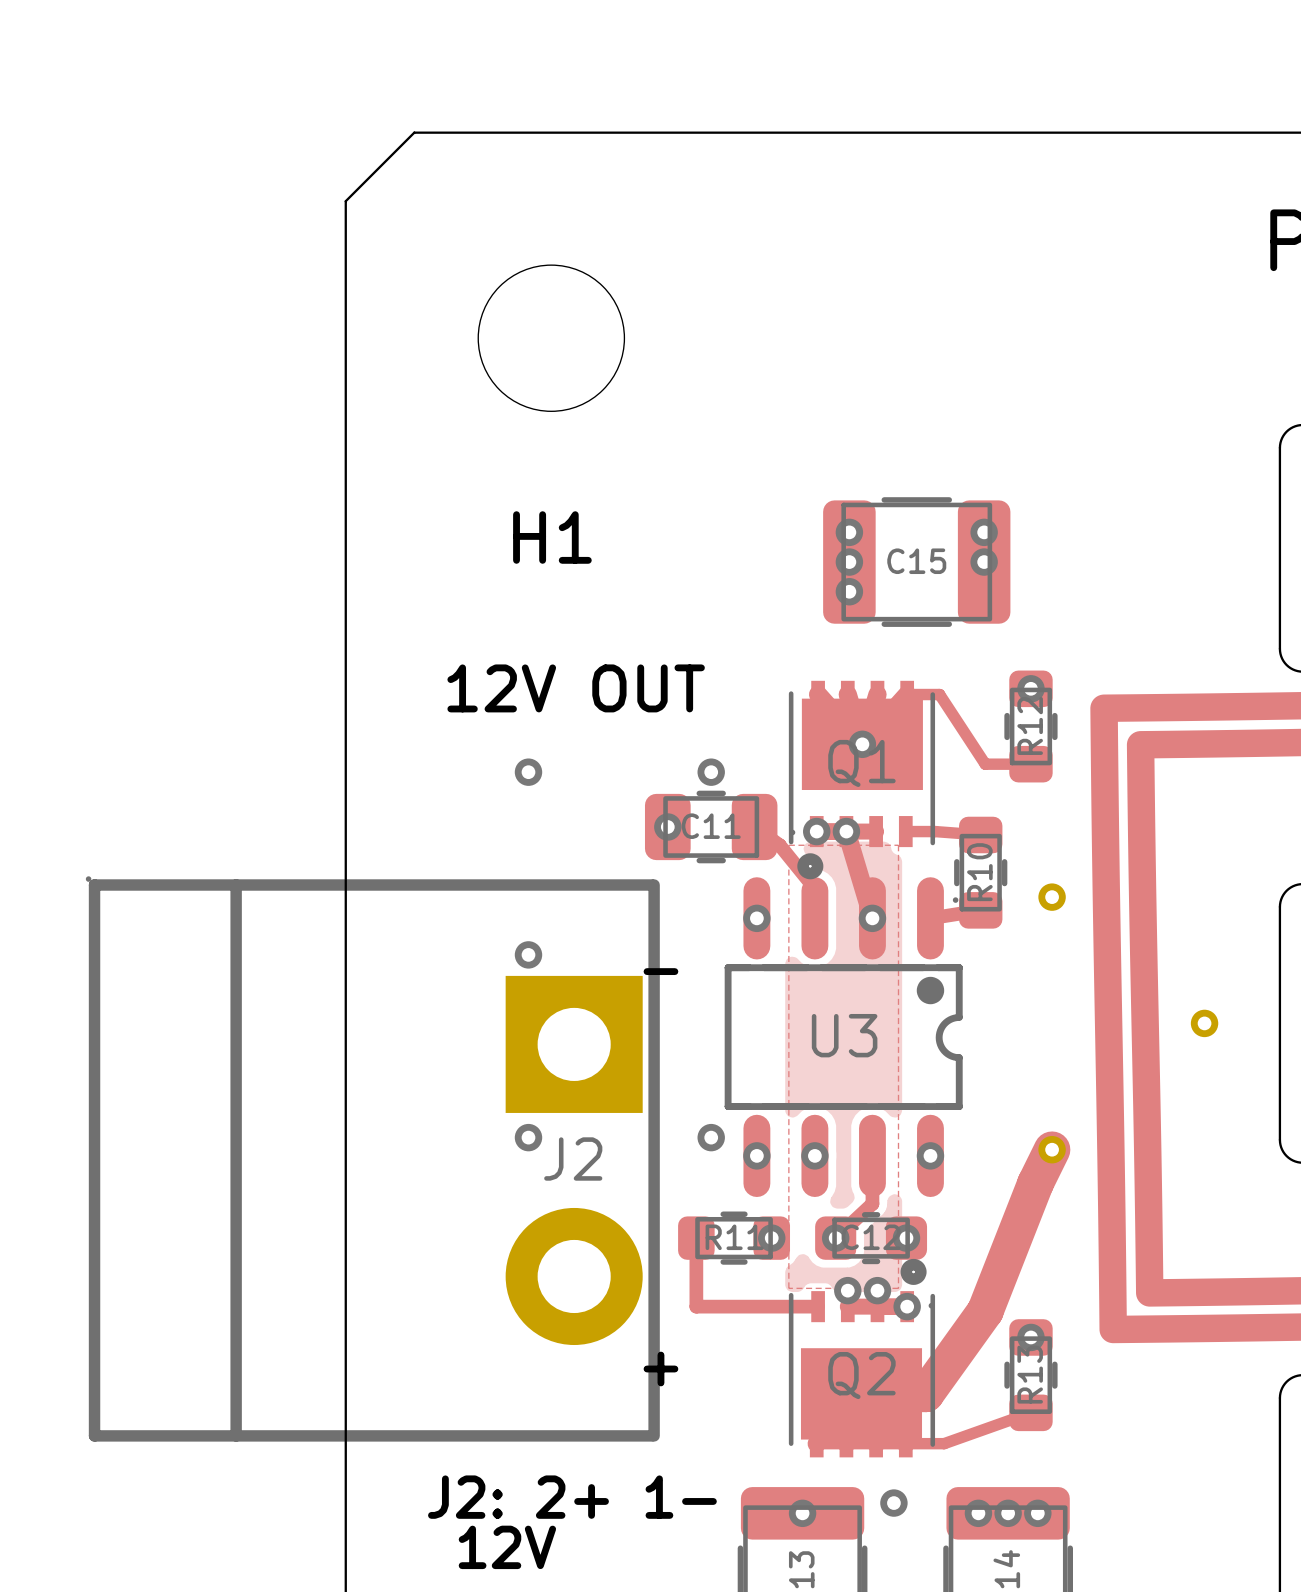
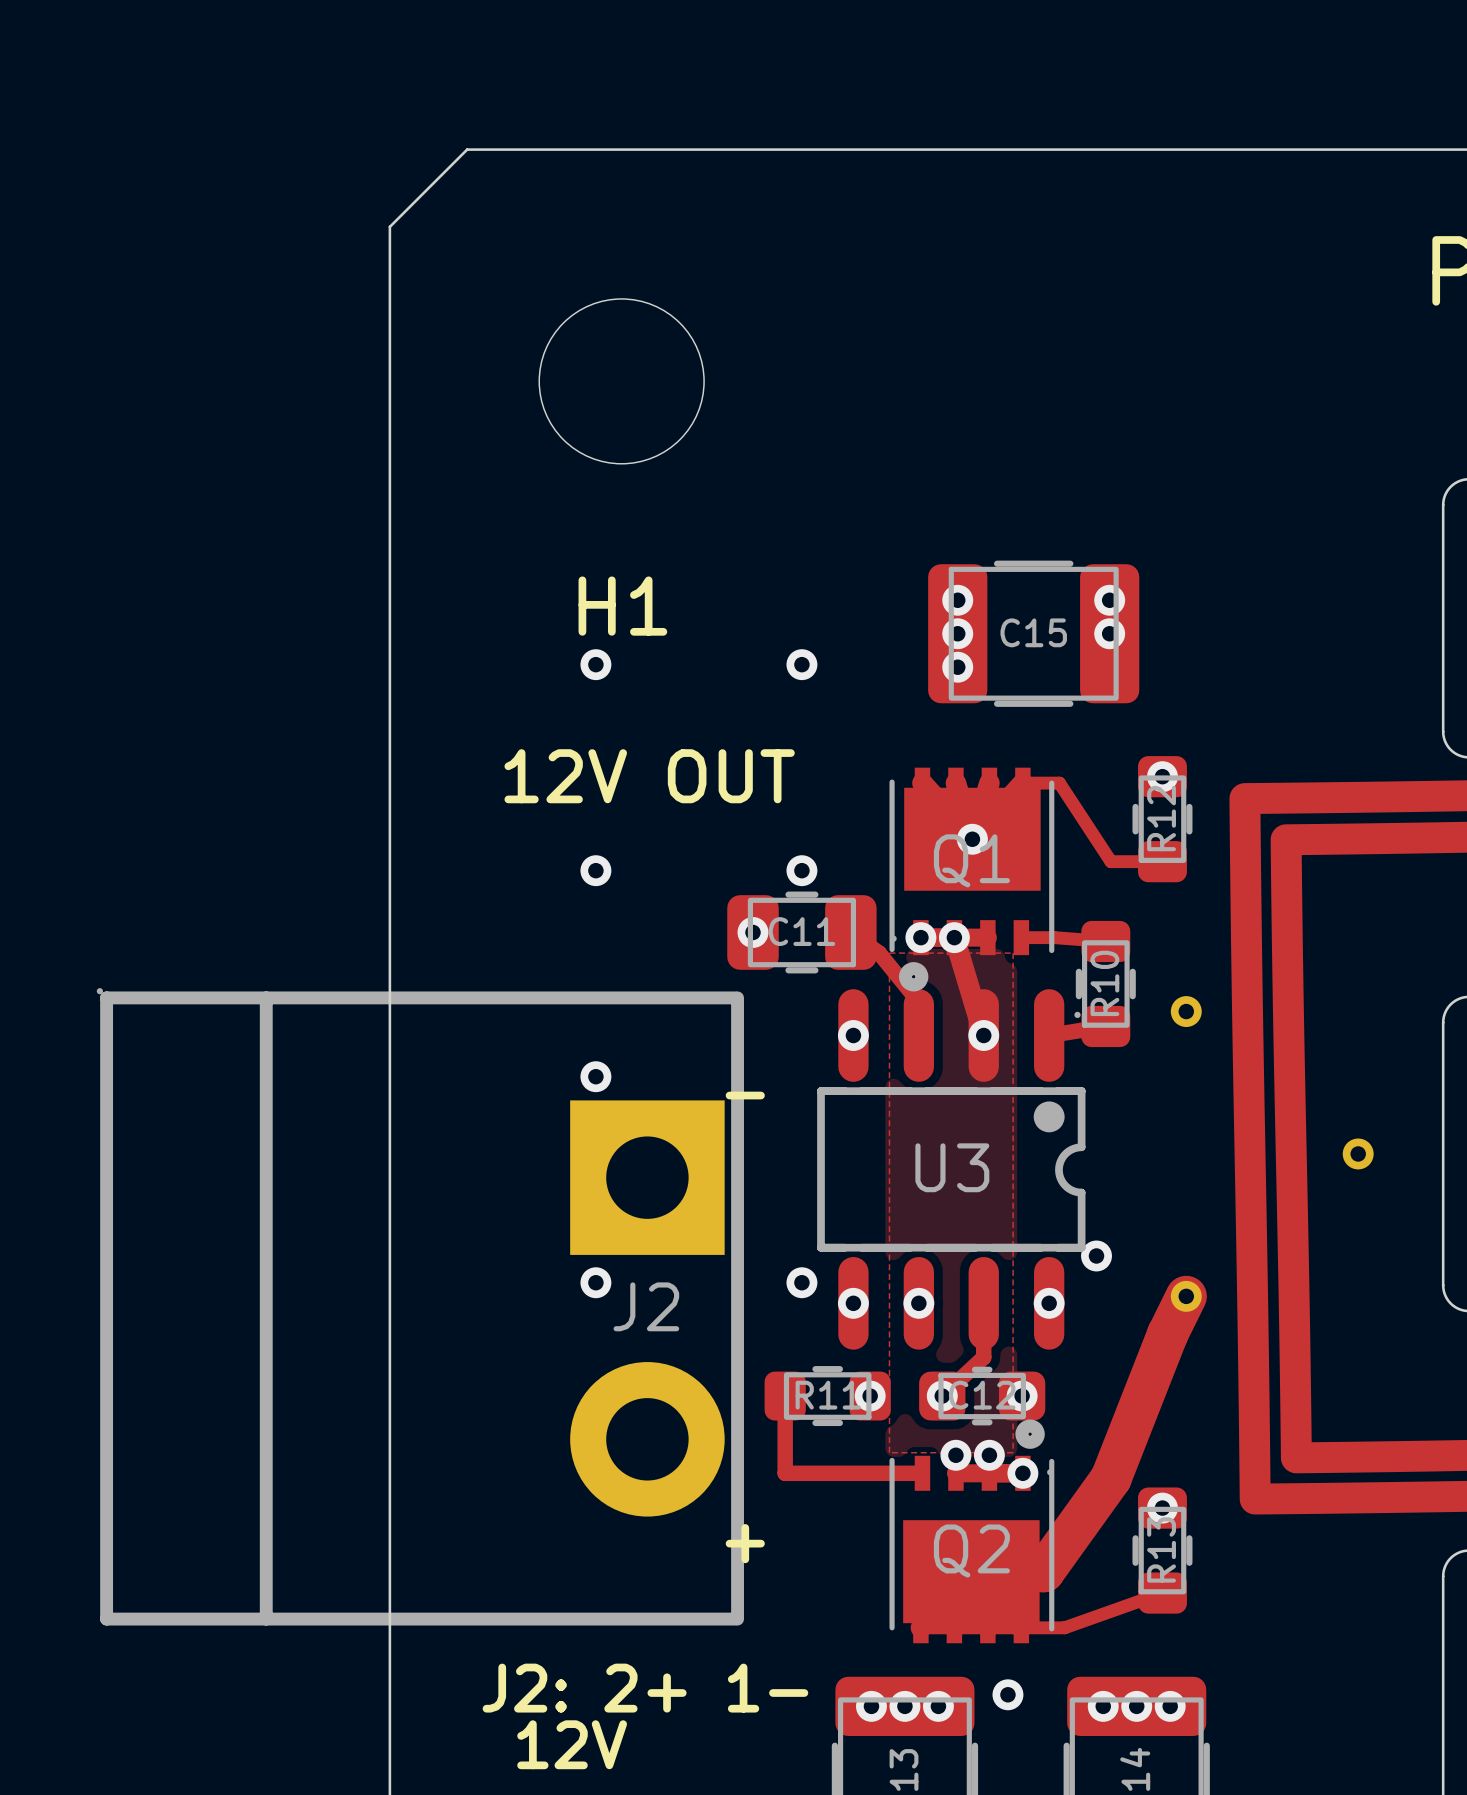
via: none -> (595, 664)
via: none -> (801, 664)
via: none -> (1096, 1255)
via: none -> (871, 1706)
via: none -> (938, 1706)

